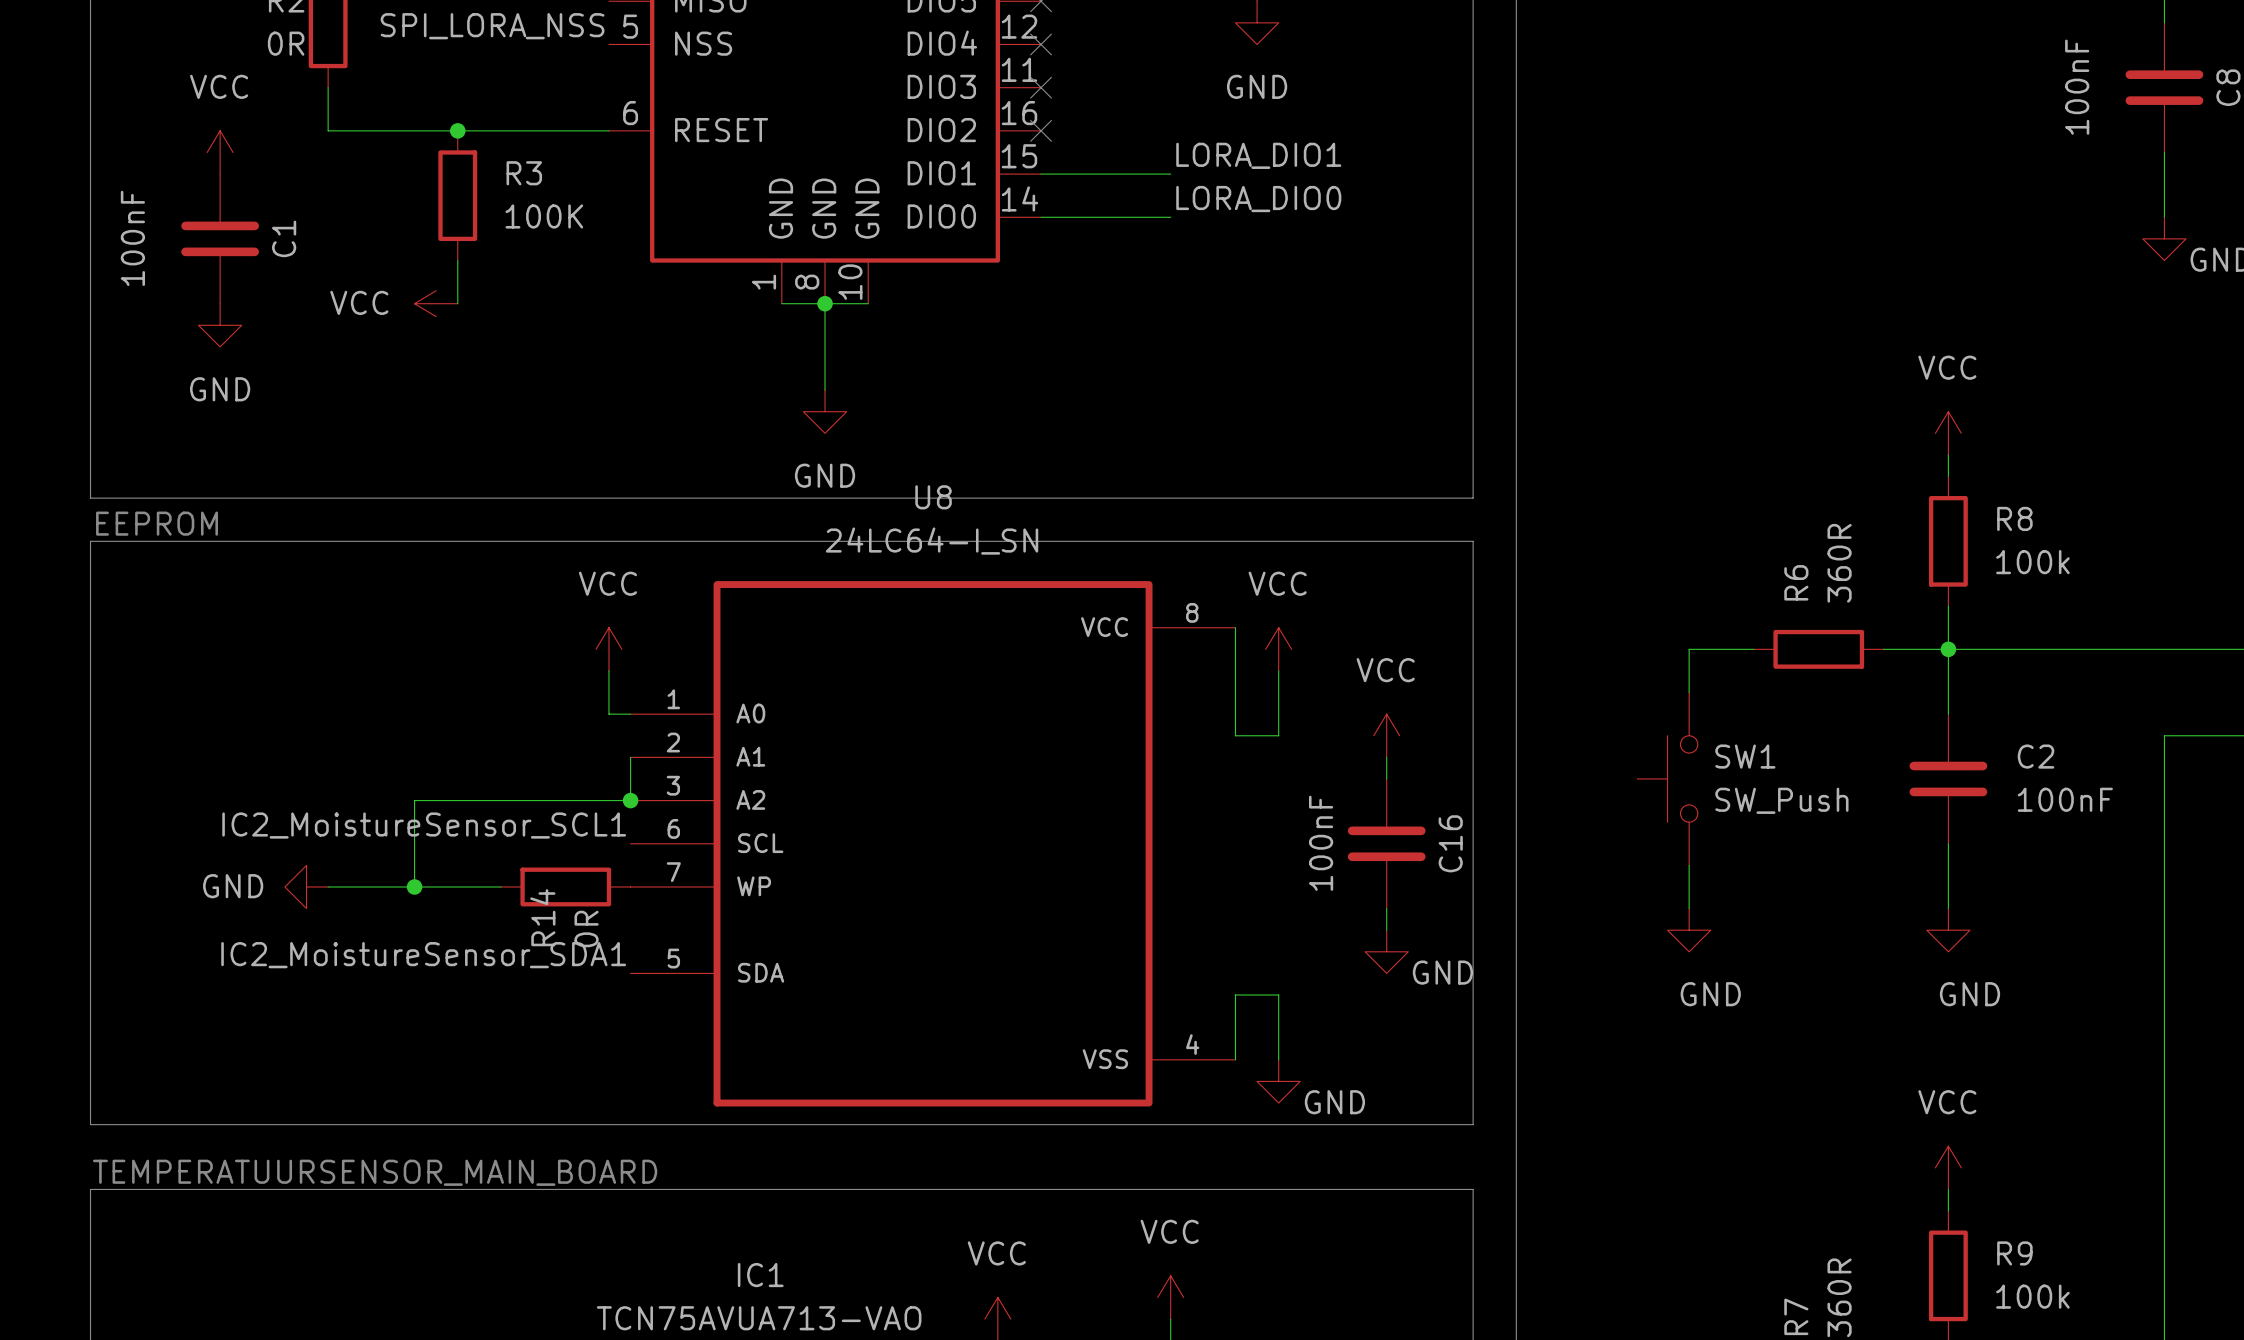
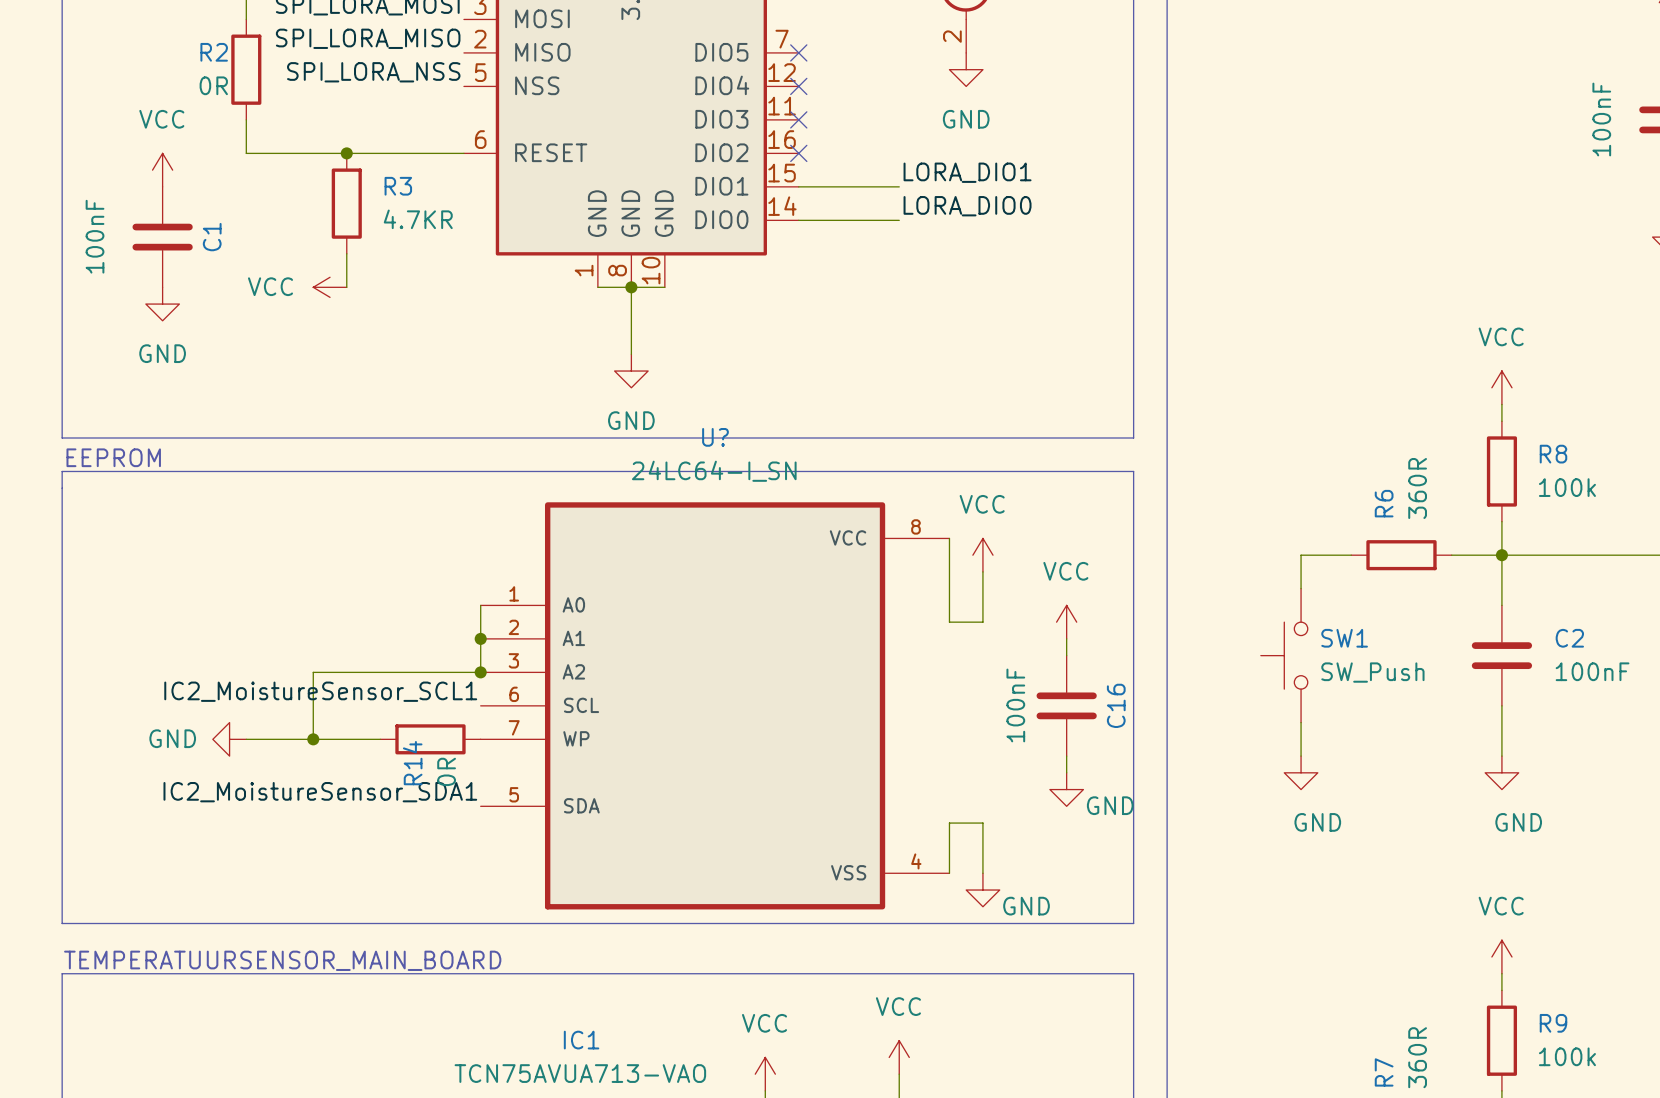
R3 value: 100K (544, 216) -> 4.7KR (418, 219)
U8 name: U8 (933, 497) -> U? (715, 437)
power symbol: VCC (608, 649) -> none
wire: (608, 670) (608, 714) (630, 714) -> (480, 638) (480, 605)
junction: none -> (480, 638)

